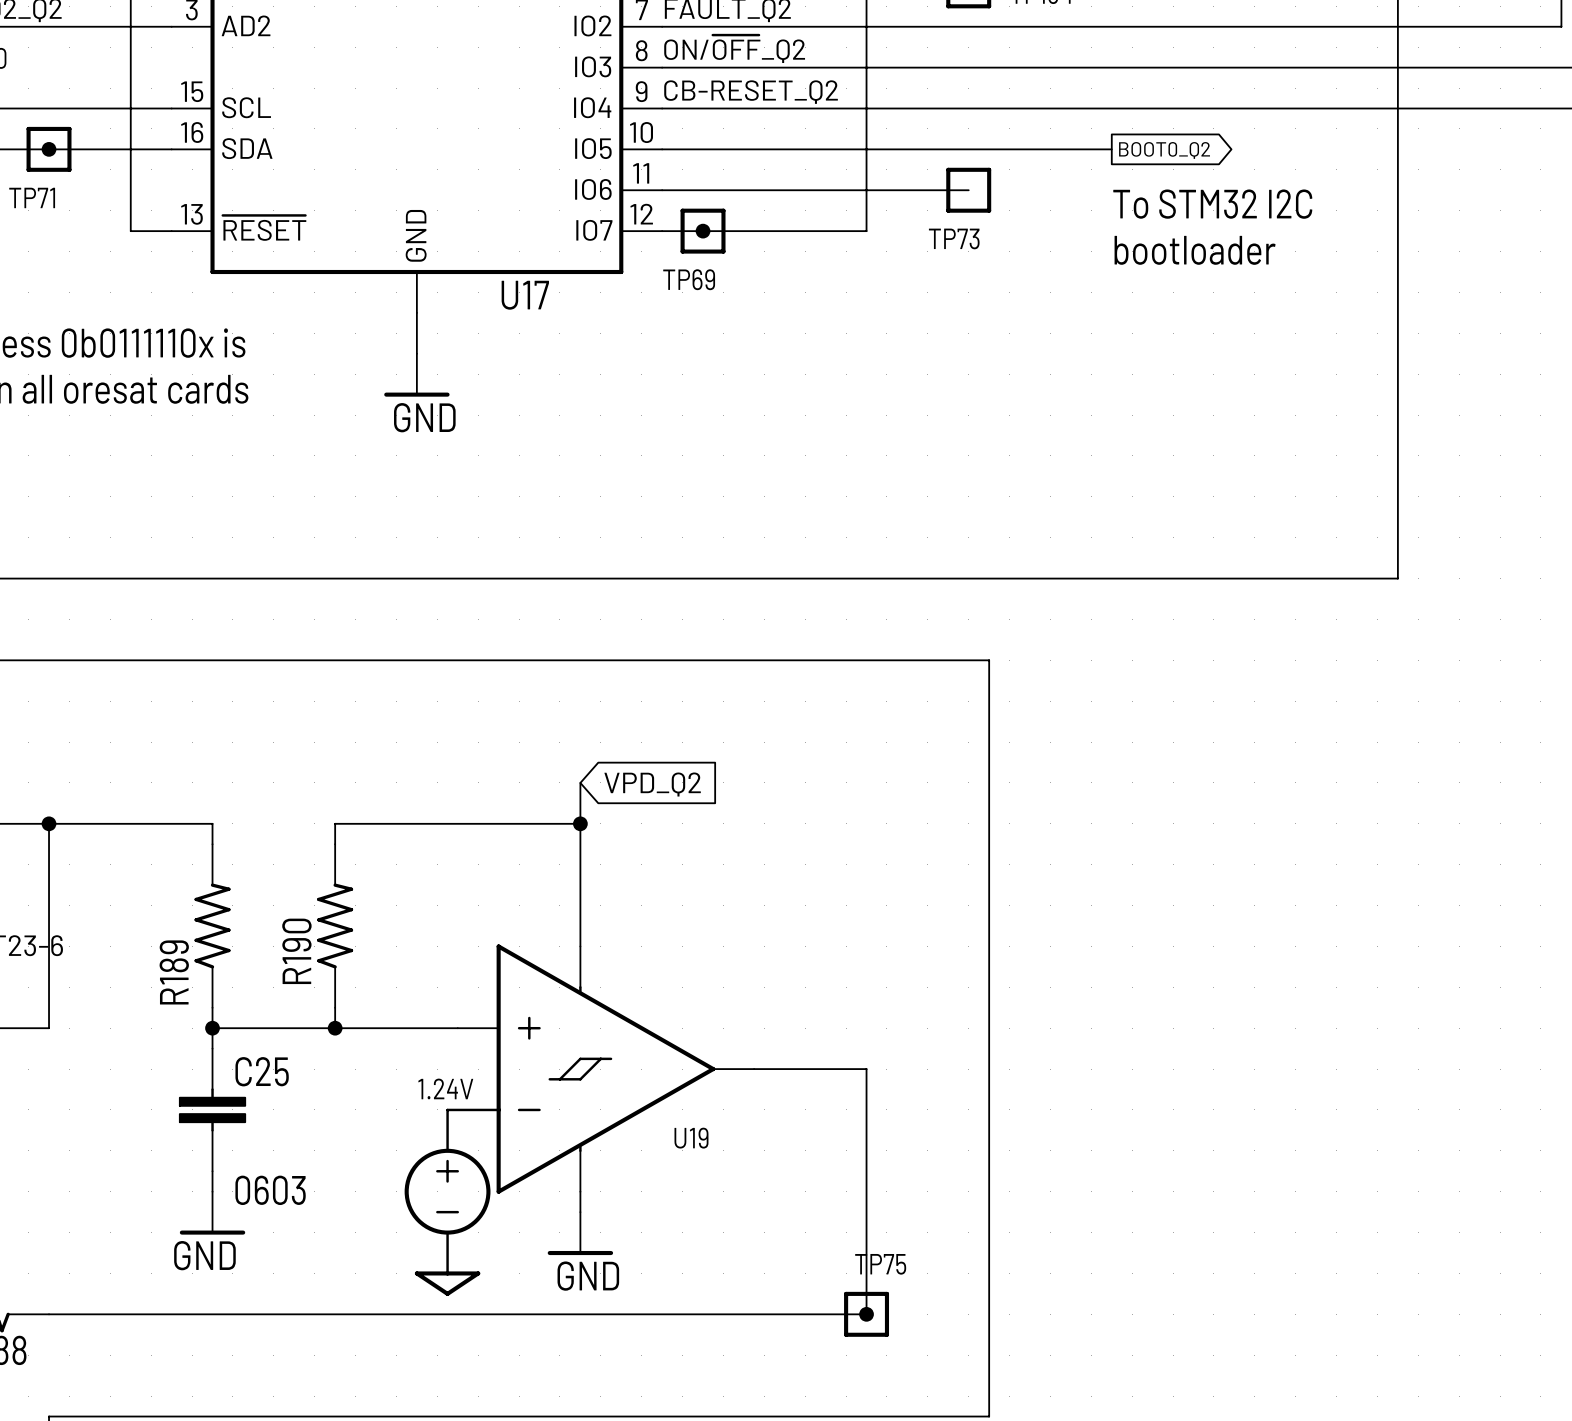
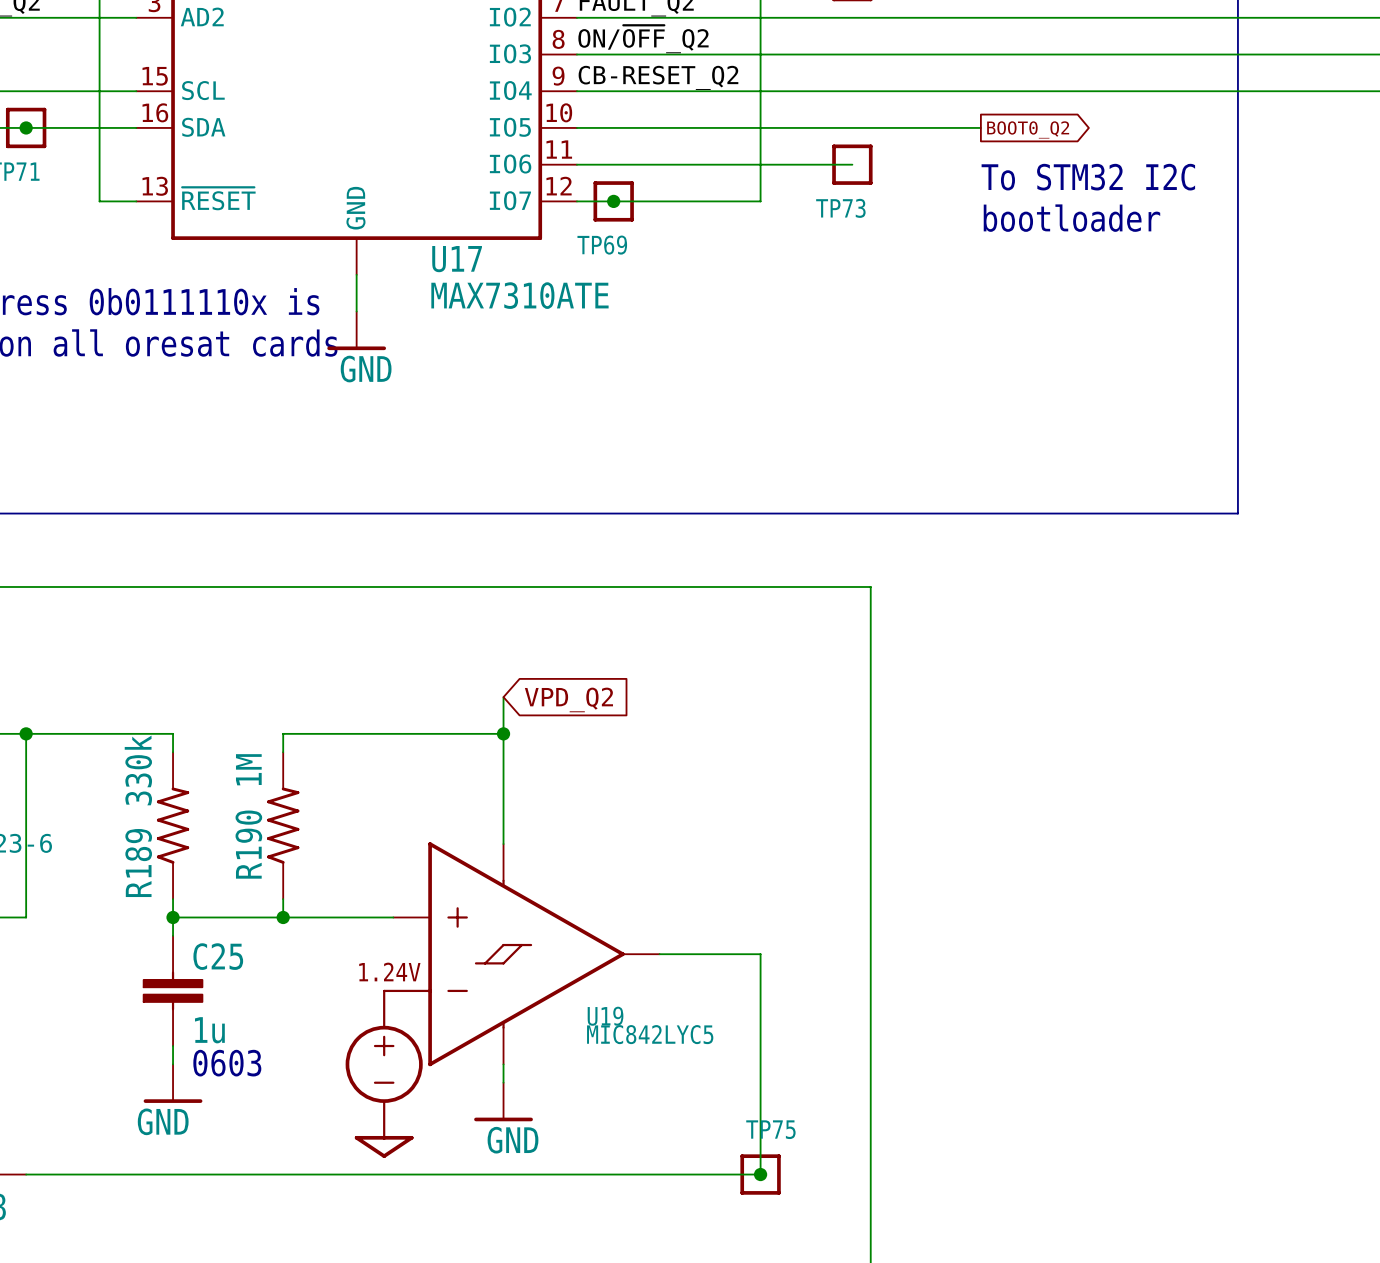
U17 value: none -> MAX7310ATE (519, 295)
R190 value: none -> 1M (248, 769)
R189 value: none -> 330k (138, 770)
C25 value: none -> 1u (209, 1030)
U19 value: none -> MIC842LYC5 (650, 1034)

